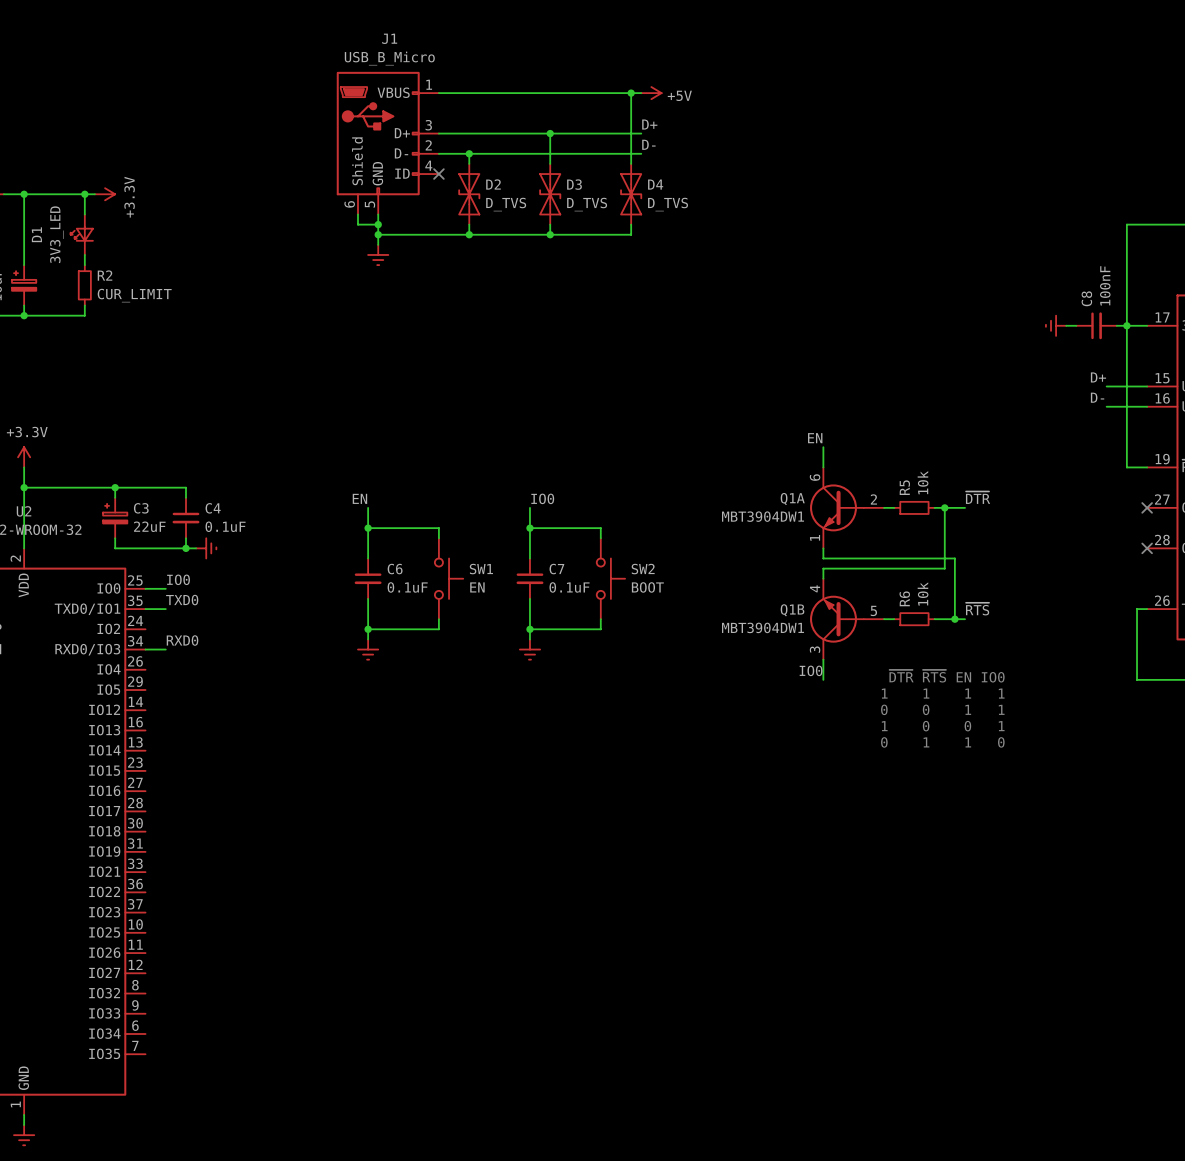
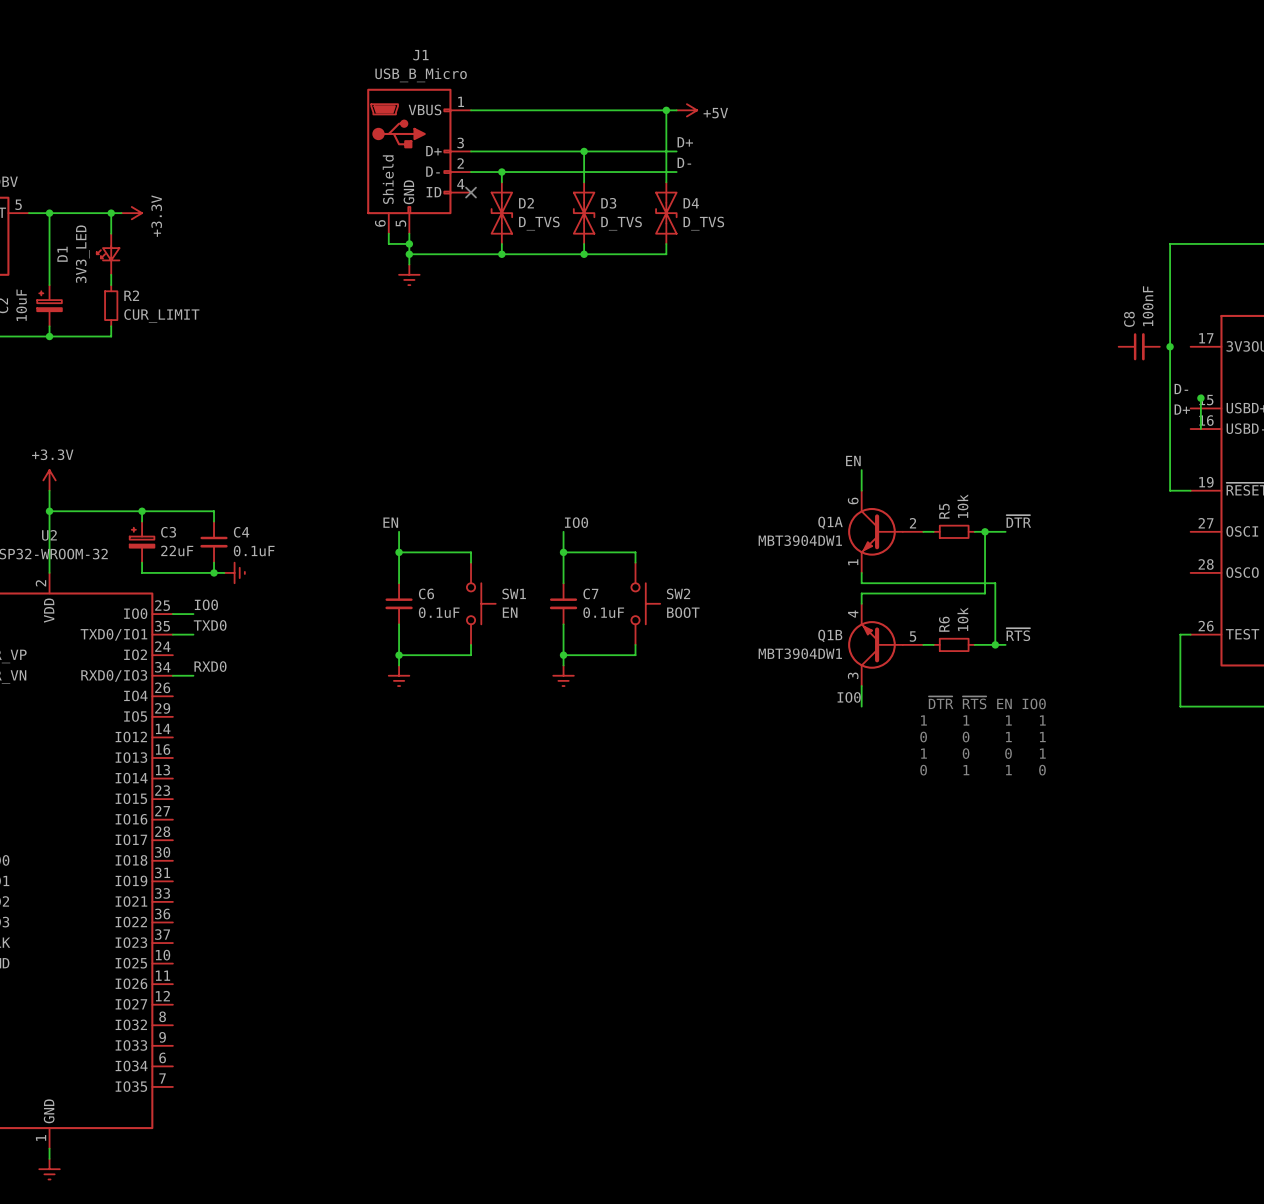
power symbol: (1056, 325) -> none
wire: (1066, 325) (1076, 325) -> none
wire: (1116, 325) (1147, 325) -> none
wire: none -> (1200, 398) (1200, 429)
junction: none -> (1200, 398)
label position: D+ (1098, 377) -> D+ (1182, 409)
wire: (1106, 386) (1147, 386) -> none
label position: D- (1097, 397) -> D- (1181, 389)
wire: (1106, 406) (1147, 406) -> none
no-connect mark: (1147, 507) -> none
no-connect mark: (1147, 548) -> none

